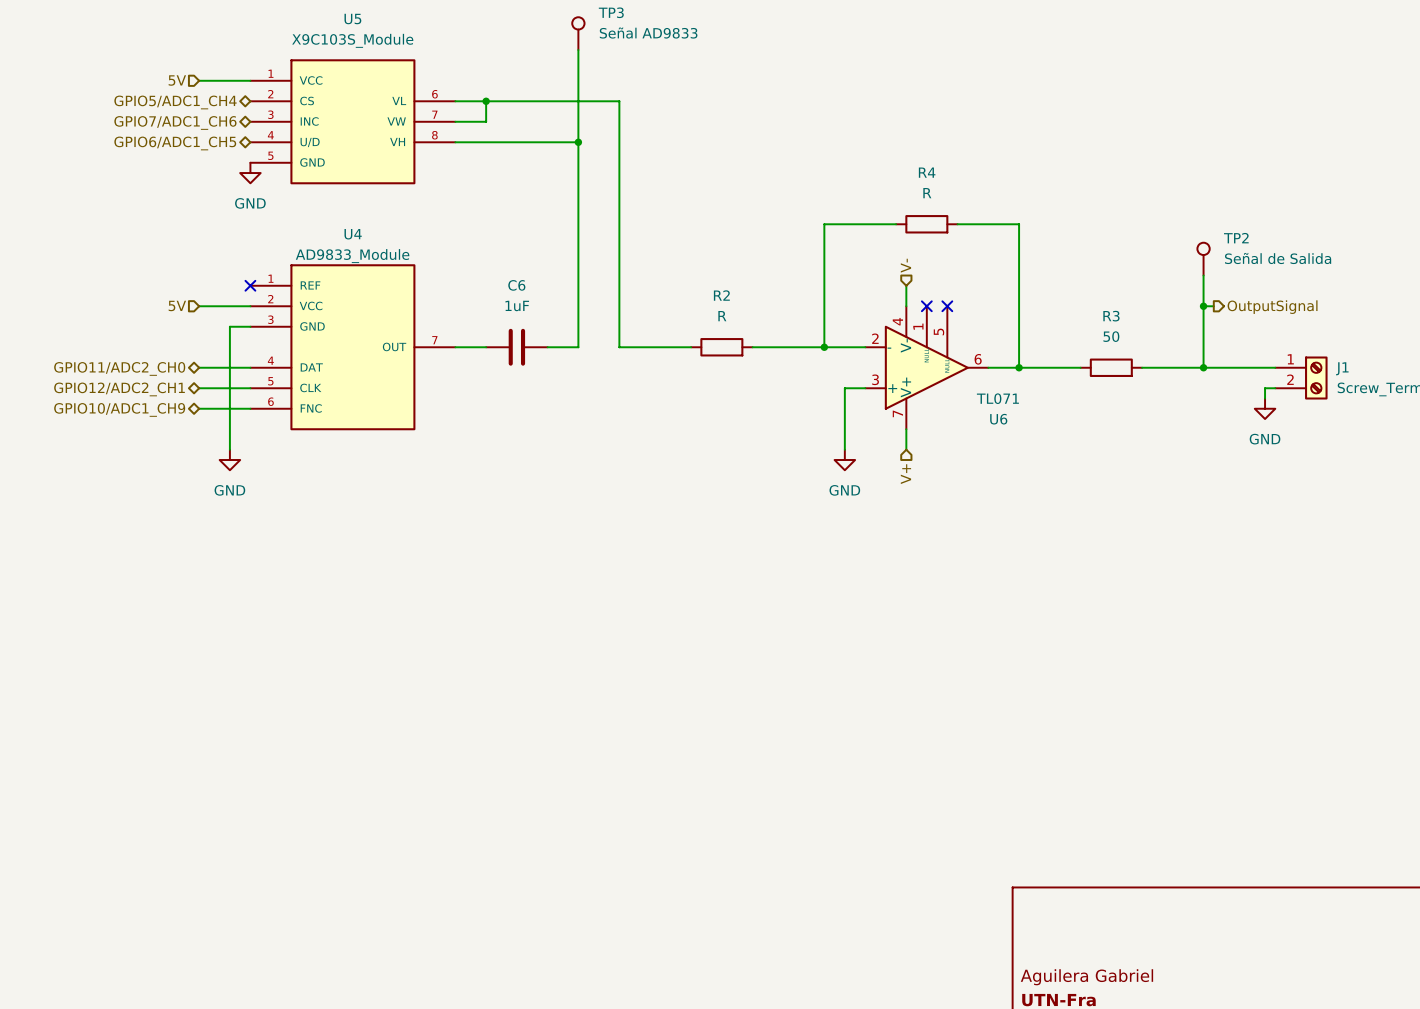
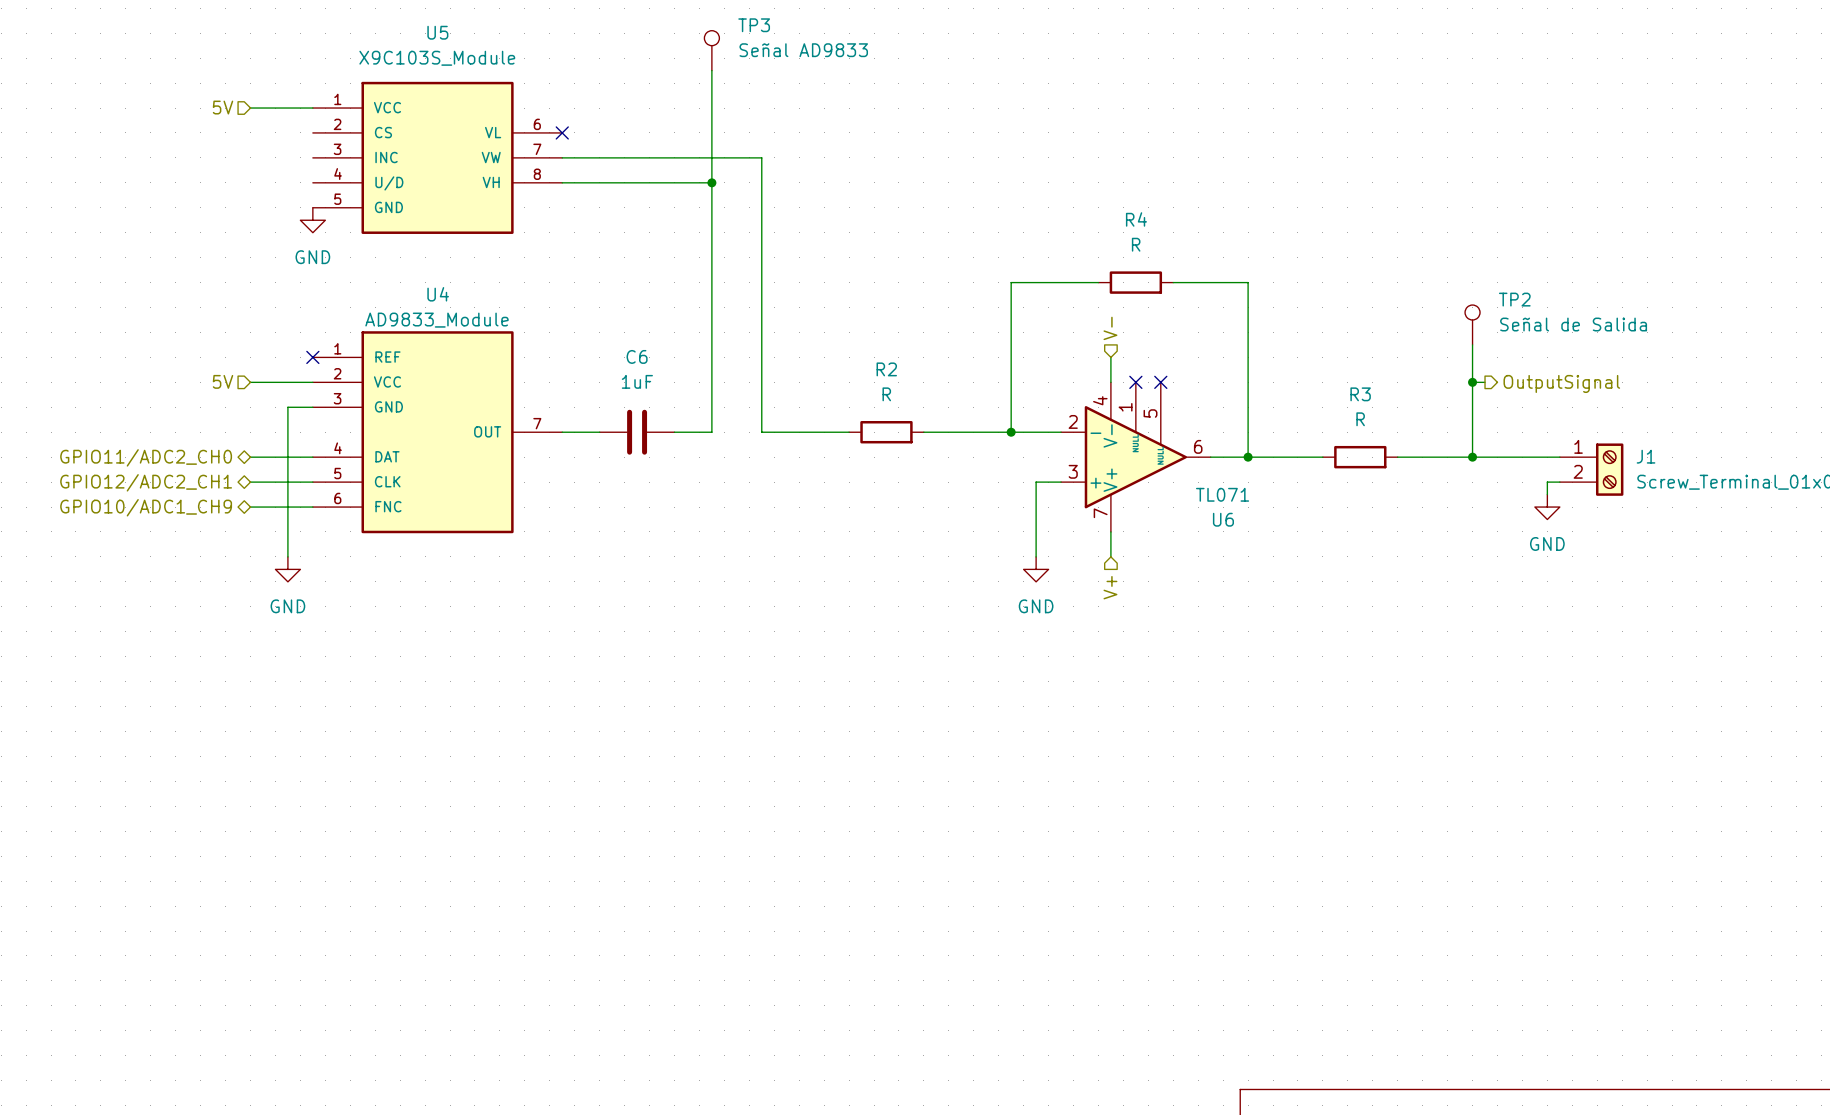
wire: (455, 101) (619, 101) (619, 121) -> (599, 157) (761, 157)
no-connect mark: none -> (562, 132)
wire: (486, 101) (486, 121) -> none
junction: (486, 101) -> none
hierarchical label: GPIO5/ADC1_CH4 (175, 102) -> none
hierarchical label: GPIO7/ADC1_CH6 (175, 122) -> none
hierarchical label: GPIO6/ADC1_CH5 (175, 143) -> none
R3 value: 50 (1111, 336) -> R (1360, 419)

